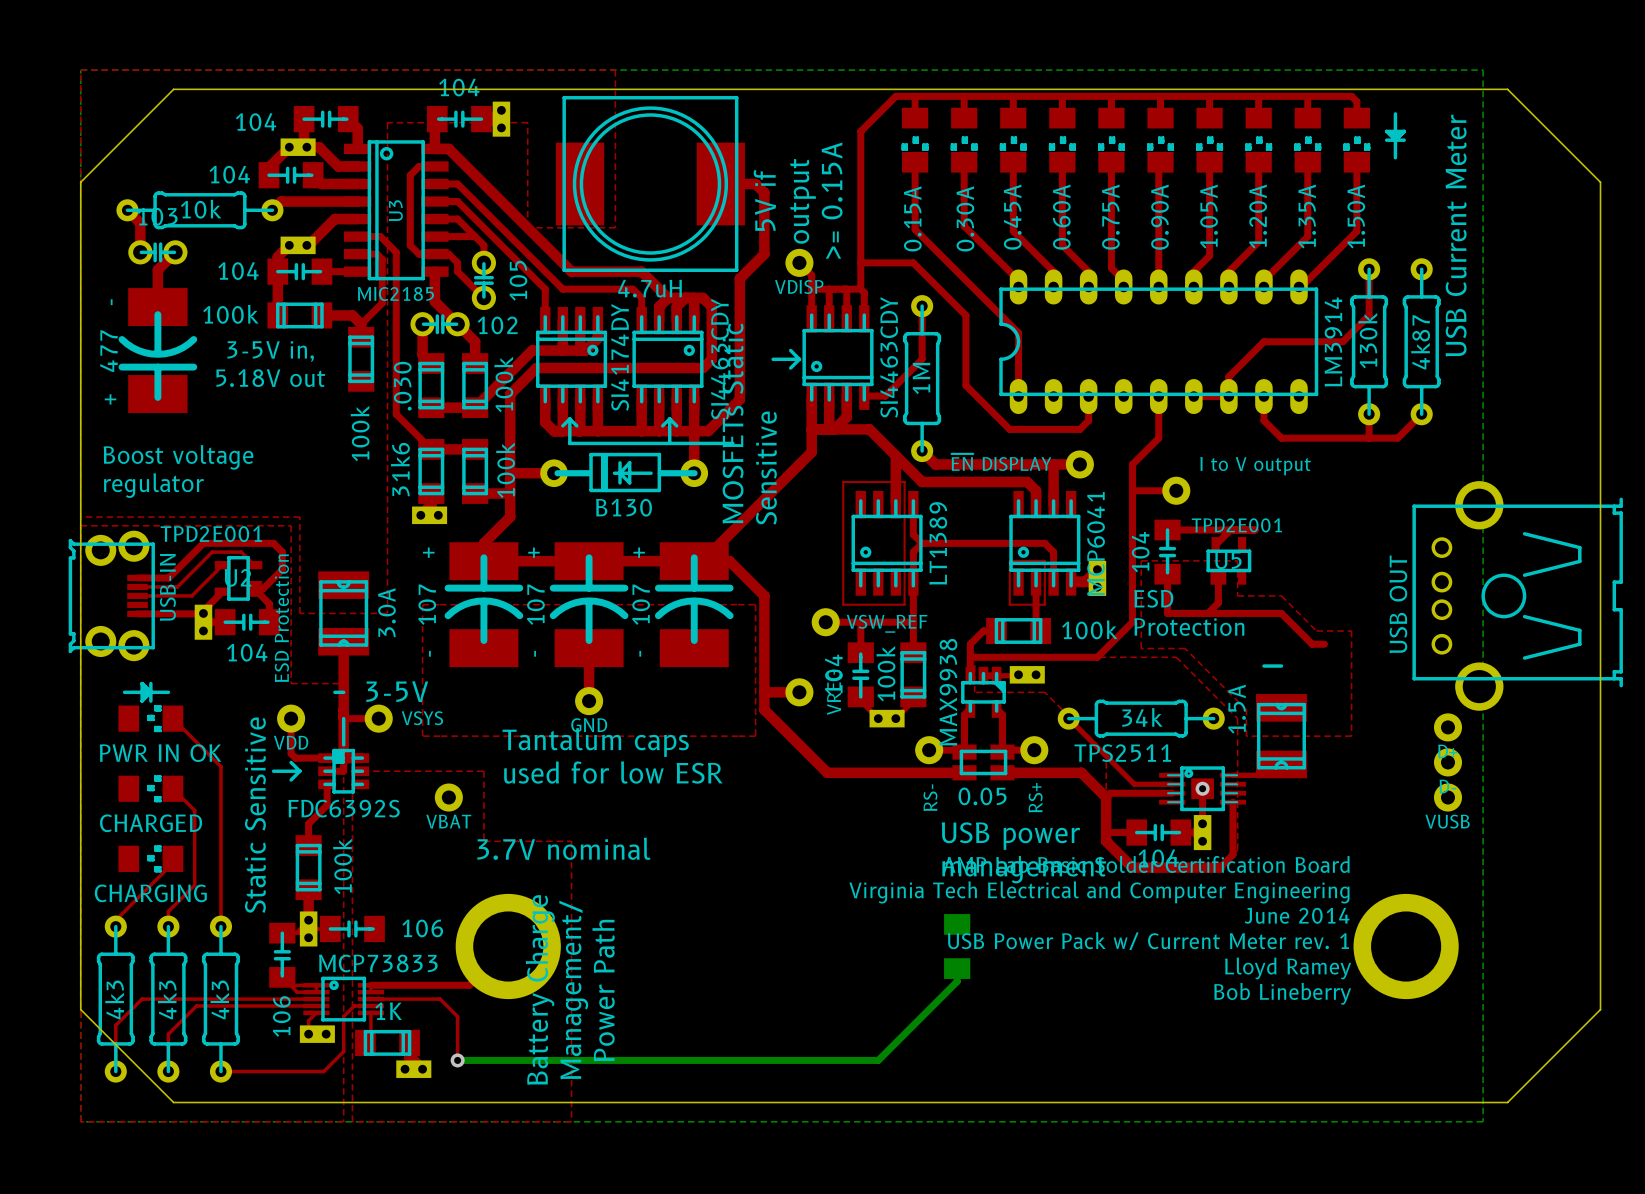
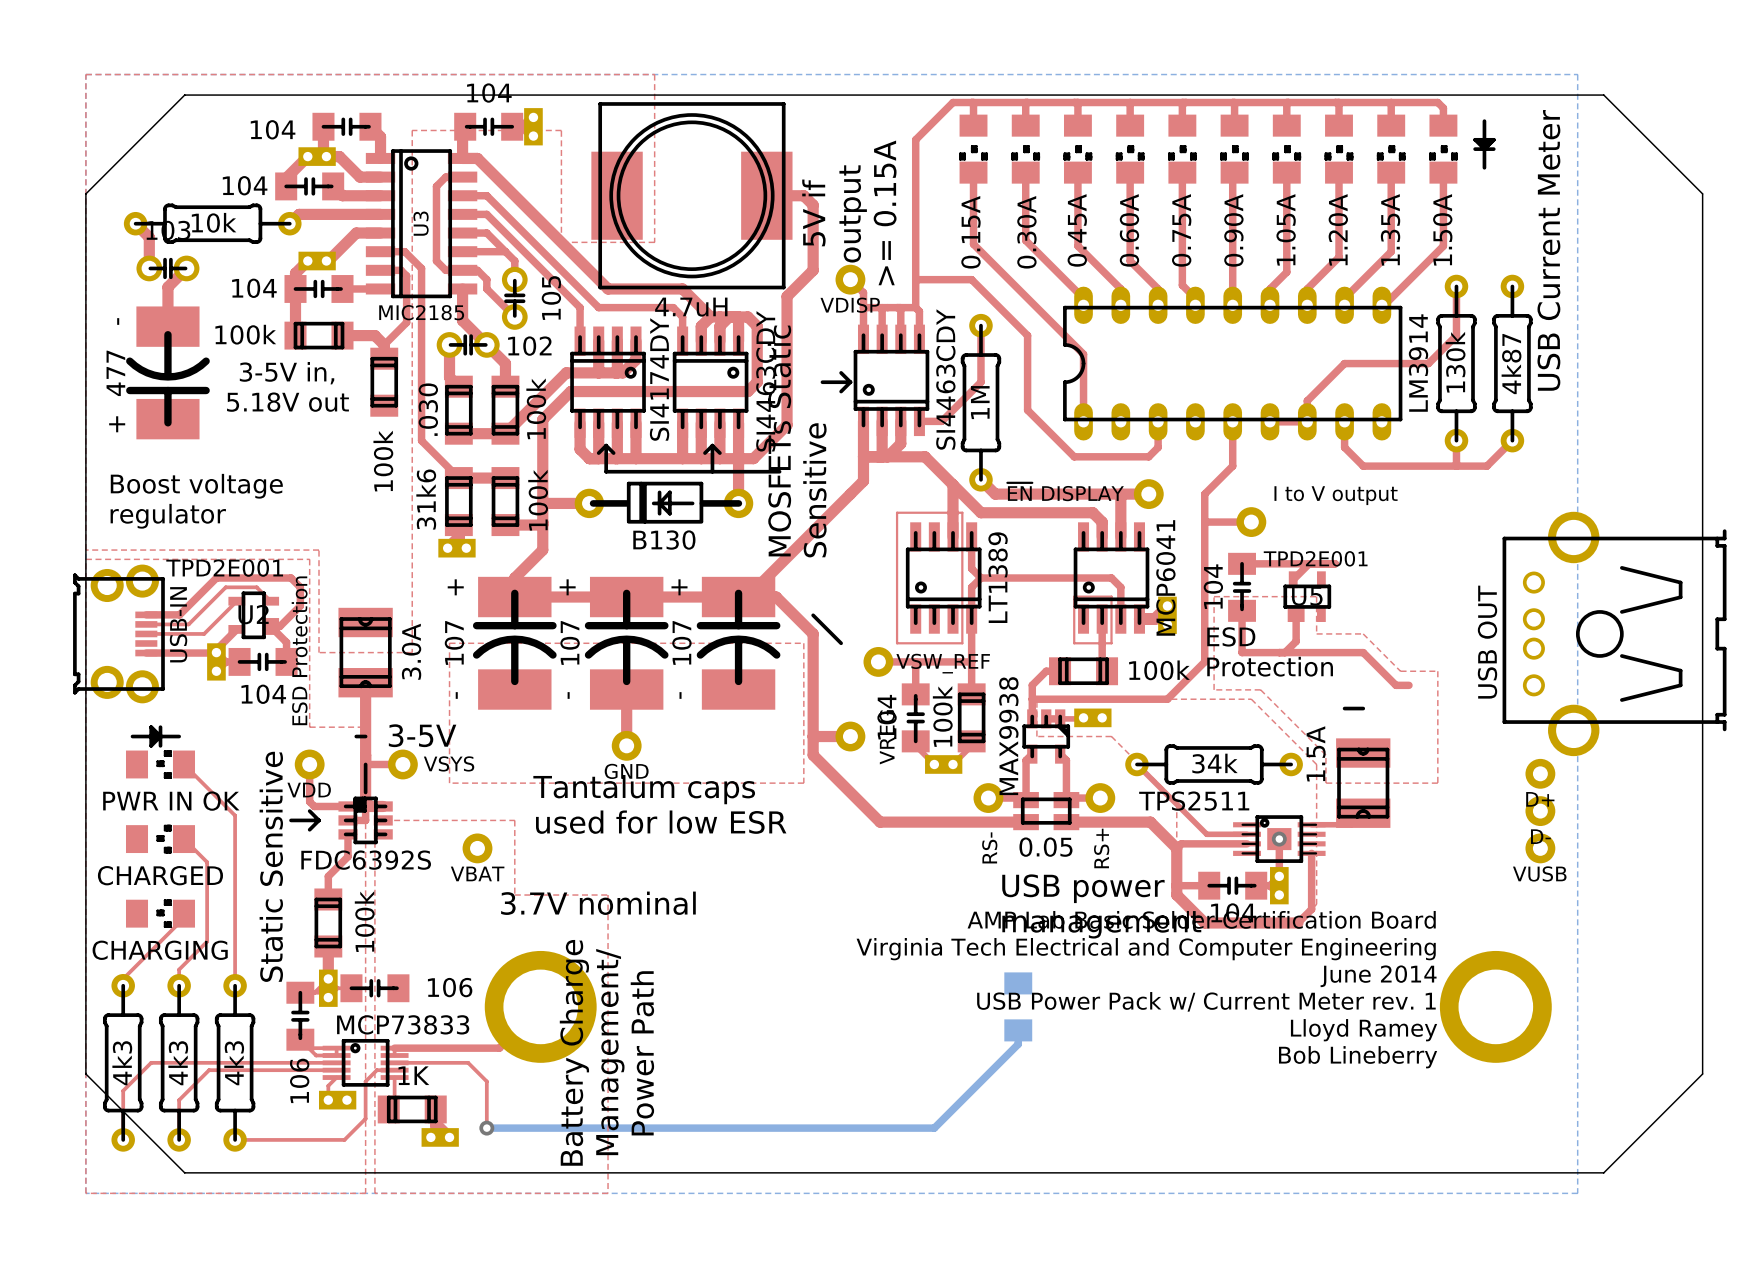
line: none -> (813, 615) (841, 643)

